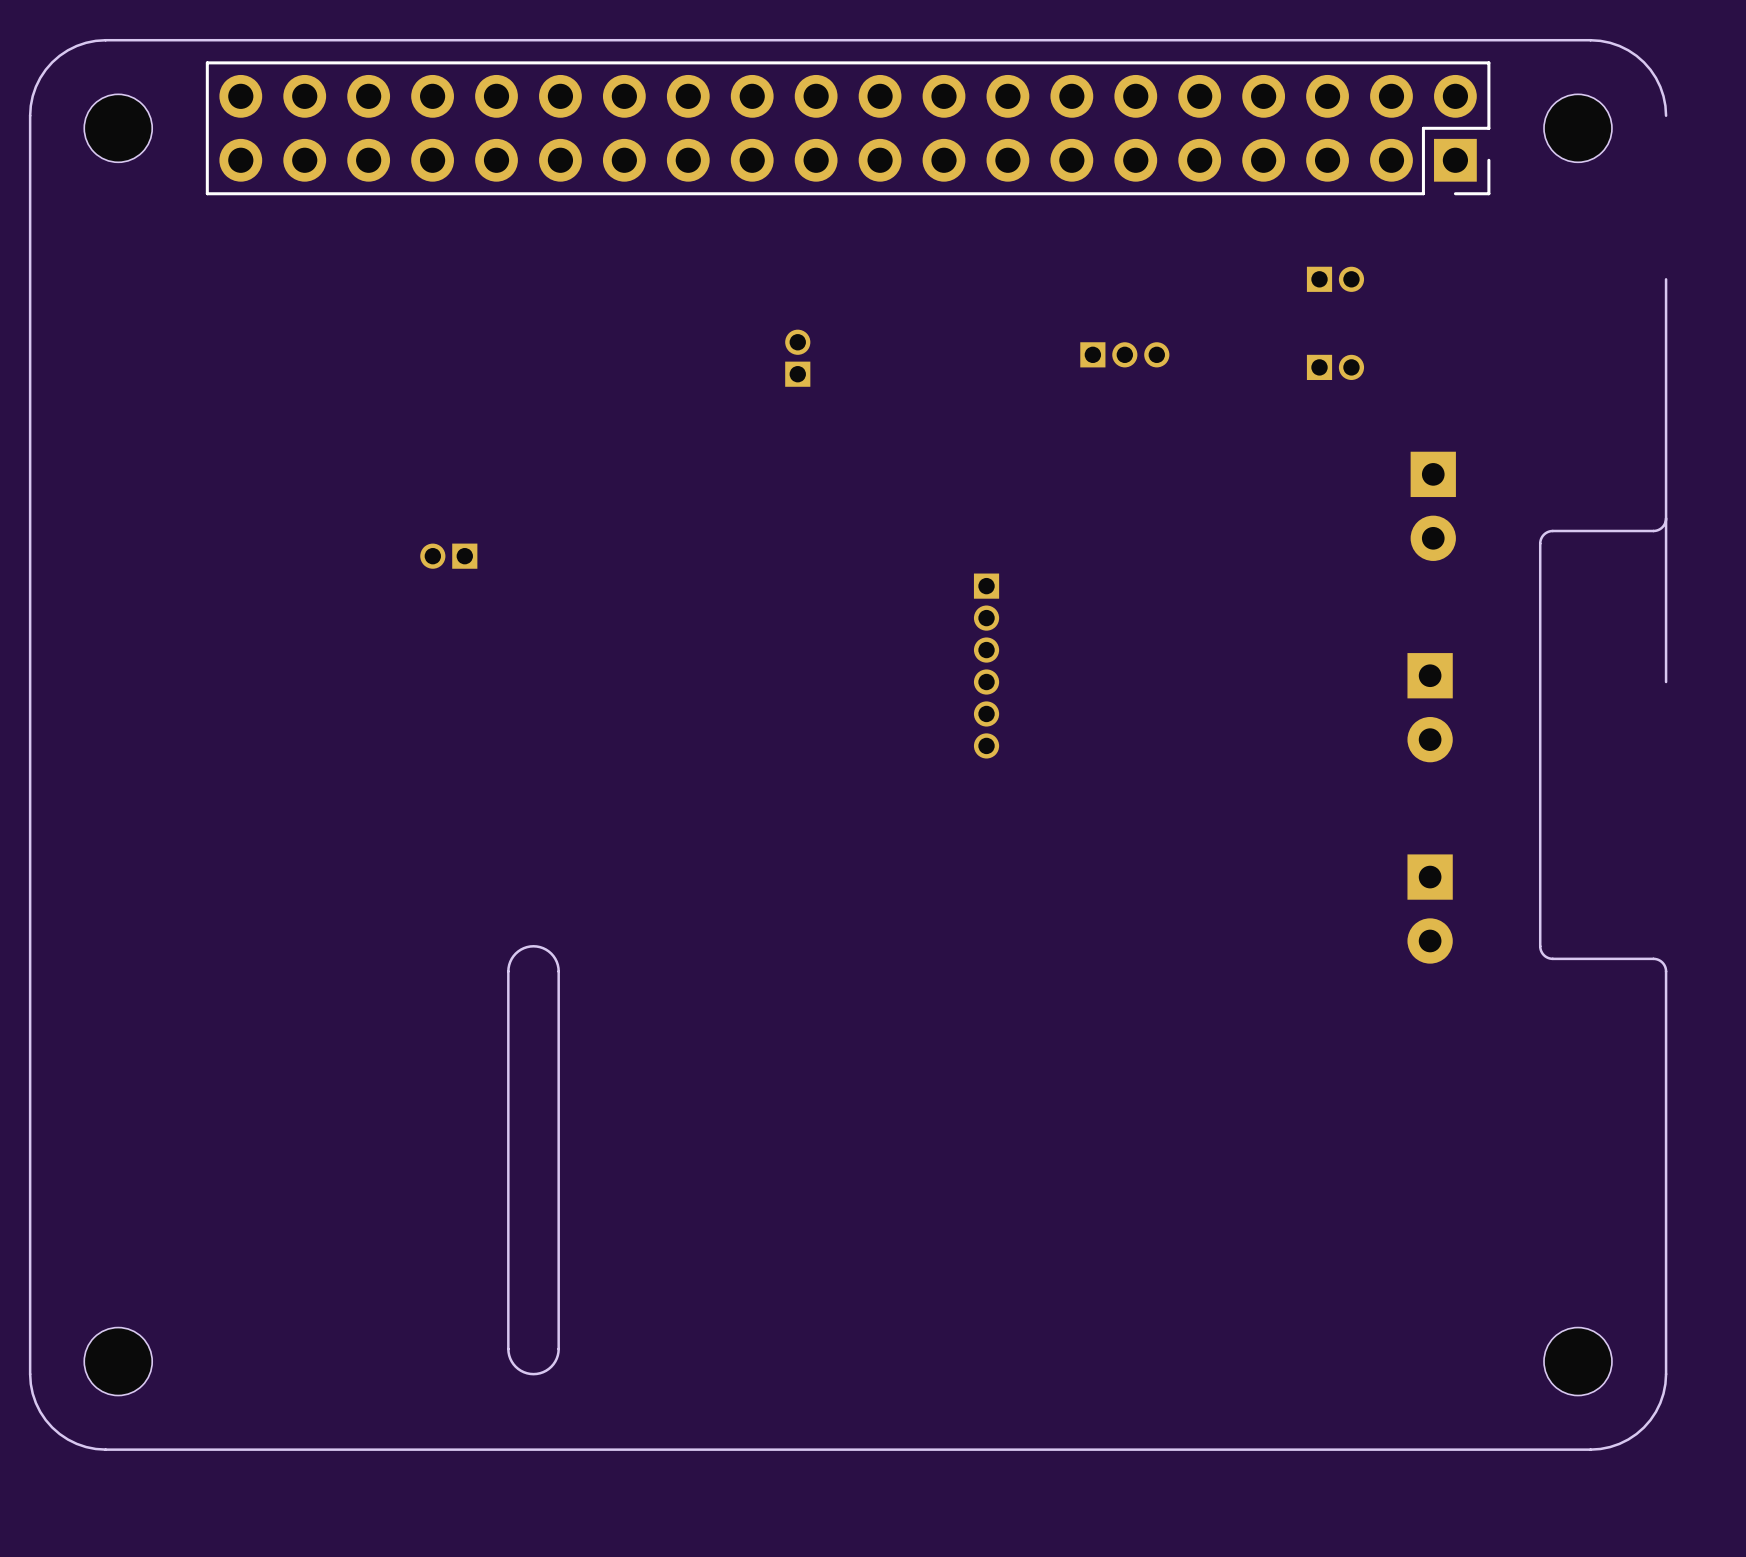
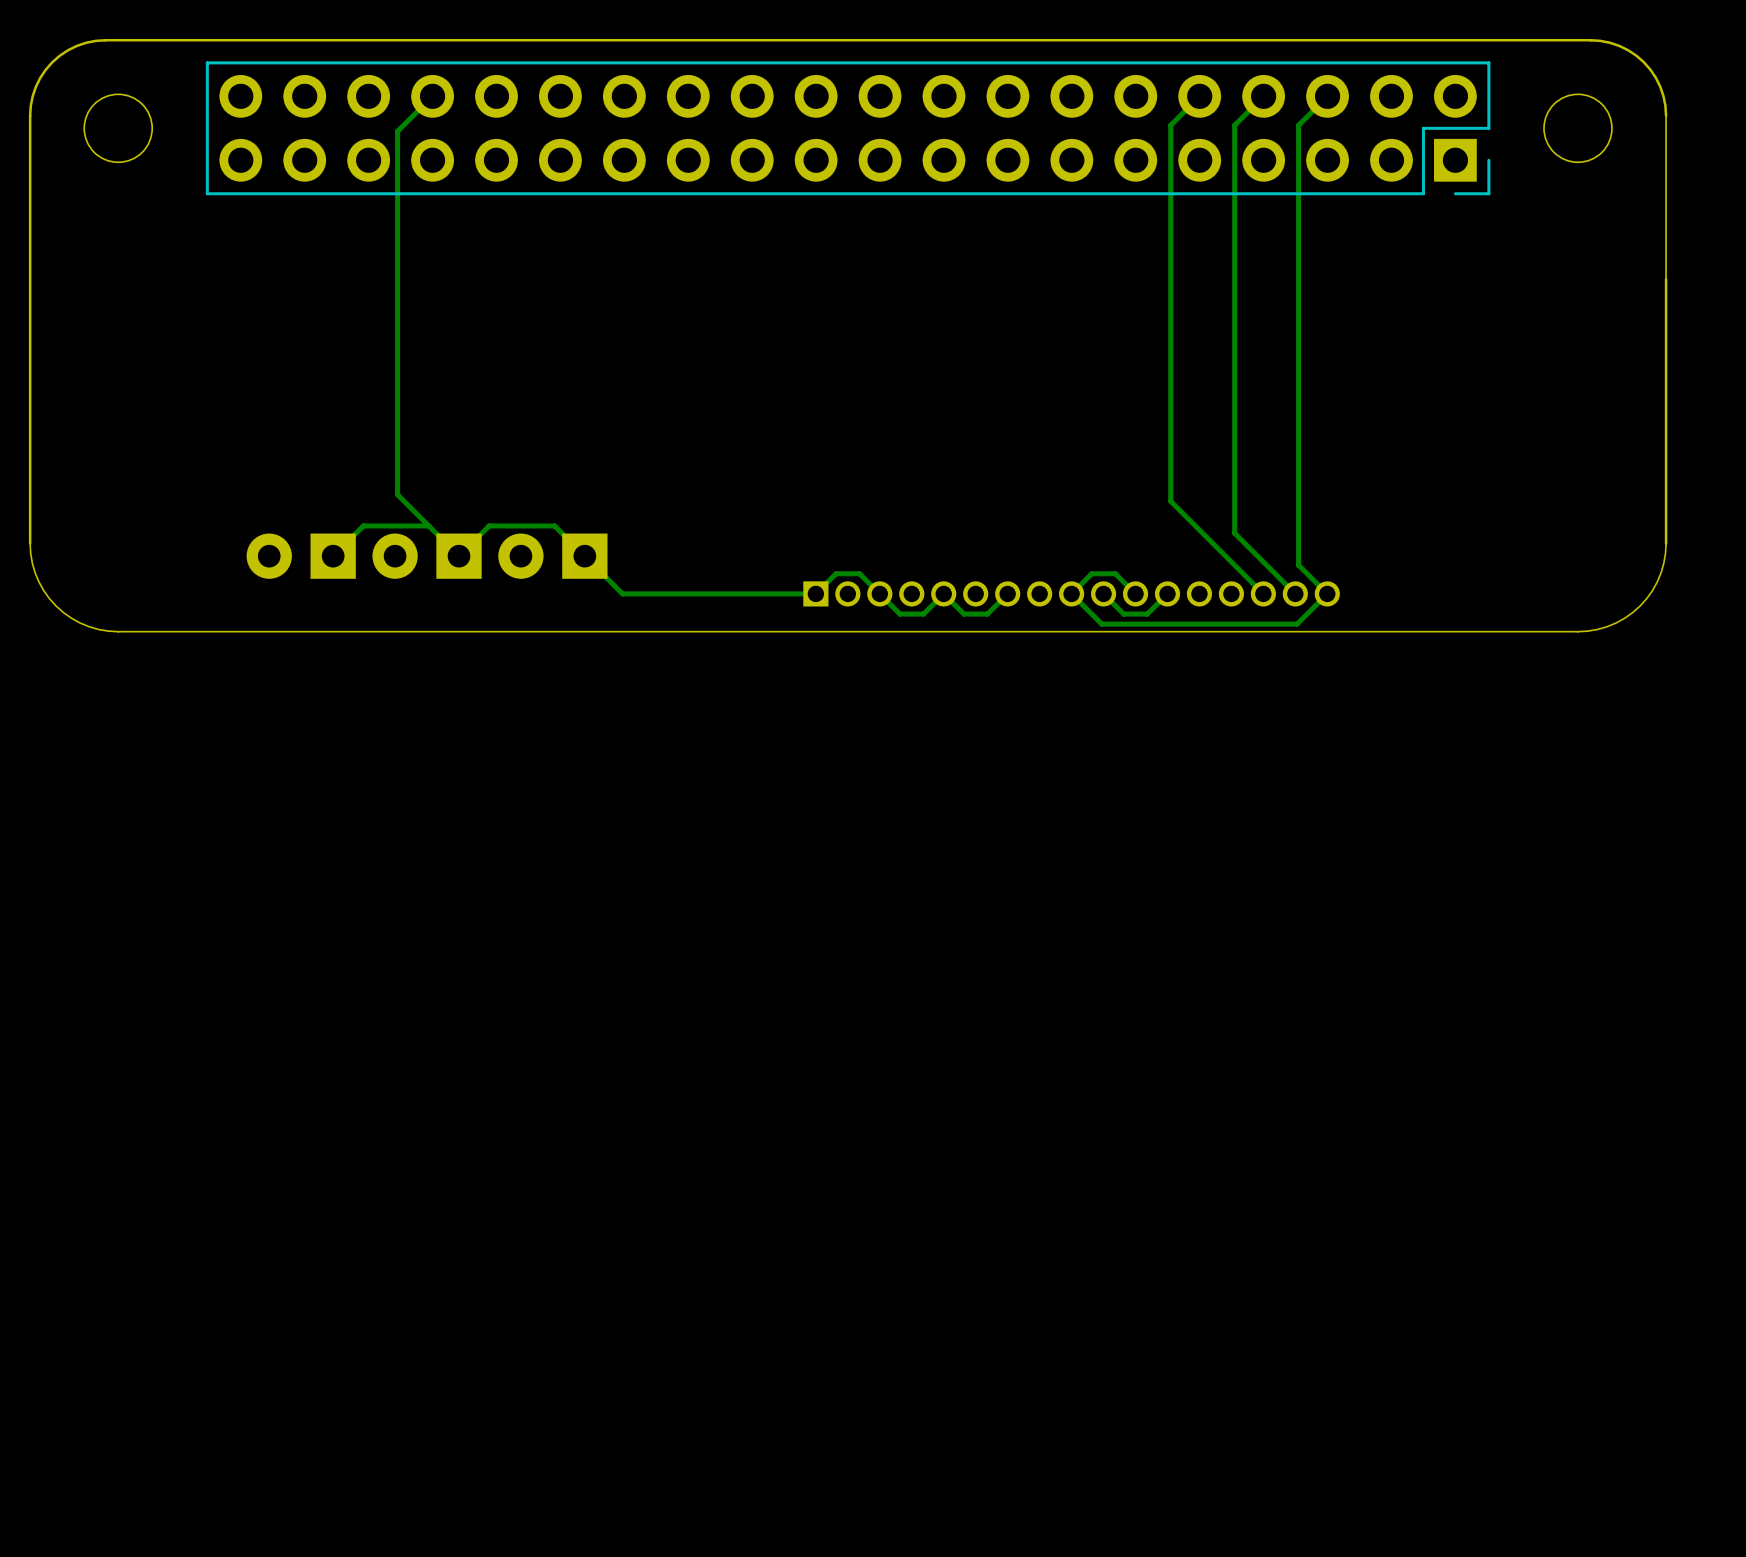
track: none -> (432, 96) (397, 131) (397, 494) (459, 556) (489, 525) (554, 525) (622, 593) (815, 593) (836, 573) (859, 573) (899, 614) (923, 614) (943, 593) (963, 614) (987, 614) (1007, 593)
track: none -> (1199, 96) (1170, 125) (1170, 501) (1263, 593)
track: none -> (1263, 96) (1234, 125) (1234, 533) (1295, 593)
track: none -> (1327, 96) (1298, 125) (1298, 565) (1327, 593) (1297, 624) (1101, 624) (1071, 593) (1091, 573) (1115, 573) (1135, 593)
board edge: none -> (1666, 115) (1666, 279)
part: (1335, 279) -> none
part: (1124, 354) -> none
part: (797, 358) -> none
part: (1335, 367) -> none
part: (1433, 506) -> none
board edge: (1666, 518) (1663, 526) (1655, 530) (1551, 531) (1543, 534) (1540, 541) (1540, 949) (1543, 955) (1551, 958) (1655, 958) (1662, 962) (1666, 971) (1665, 1383) (1655, 1411) (1636, 1434) (1610, 1447) (1590, 1449) (105, 1449) (86, 1447) (67, 1439) (52, 1427) (40, 1411) (32, 1393) (30, 1374) (30, 543) -> (1666, 543) (1663, 563) (1657, 581) (1640, 605) (1616, 622) (1597, 629) (1577, 631) (108, 631) (80, 622) (63, 612) (49, 598) (35, 572) (30, 543)
track: none -> (428, 525) (363, 525) (333, 556)
part footprint: [420, 543, 478, 569] -> [372, 533, 482, 579]
board edge: (1666, 543) (1666, 682) -> none
part: none -> (301, 556)
part: none -> (552, 556)
part: none -> (1071, 593)
track: none -> (1167, 593) (1147, 614) (1123, 614) (1103, 593)
part: (986, 666) -> none
part: (1430, 707) -> none
part: (1430, 909) -> none
board edge: (558, 971) (558, 1352) (555, 1361) (548, 1368) (540, 1373) (530, 1373) (520, 1370) (513, 1364) (508, 1348) (508, 968) (515, 953) (523, 948) (533, 946) (543, 948) (551, 953) (556, 961) (558, 971) -> none
part: (118, 1361) -> none
part: (1577, 1361) -> none

